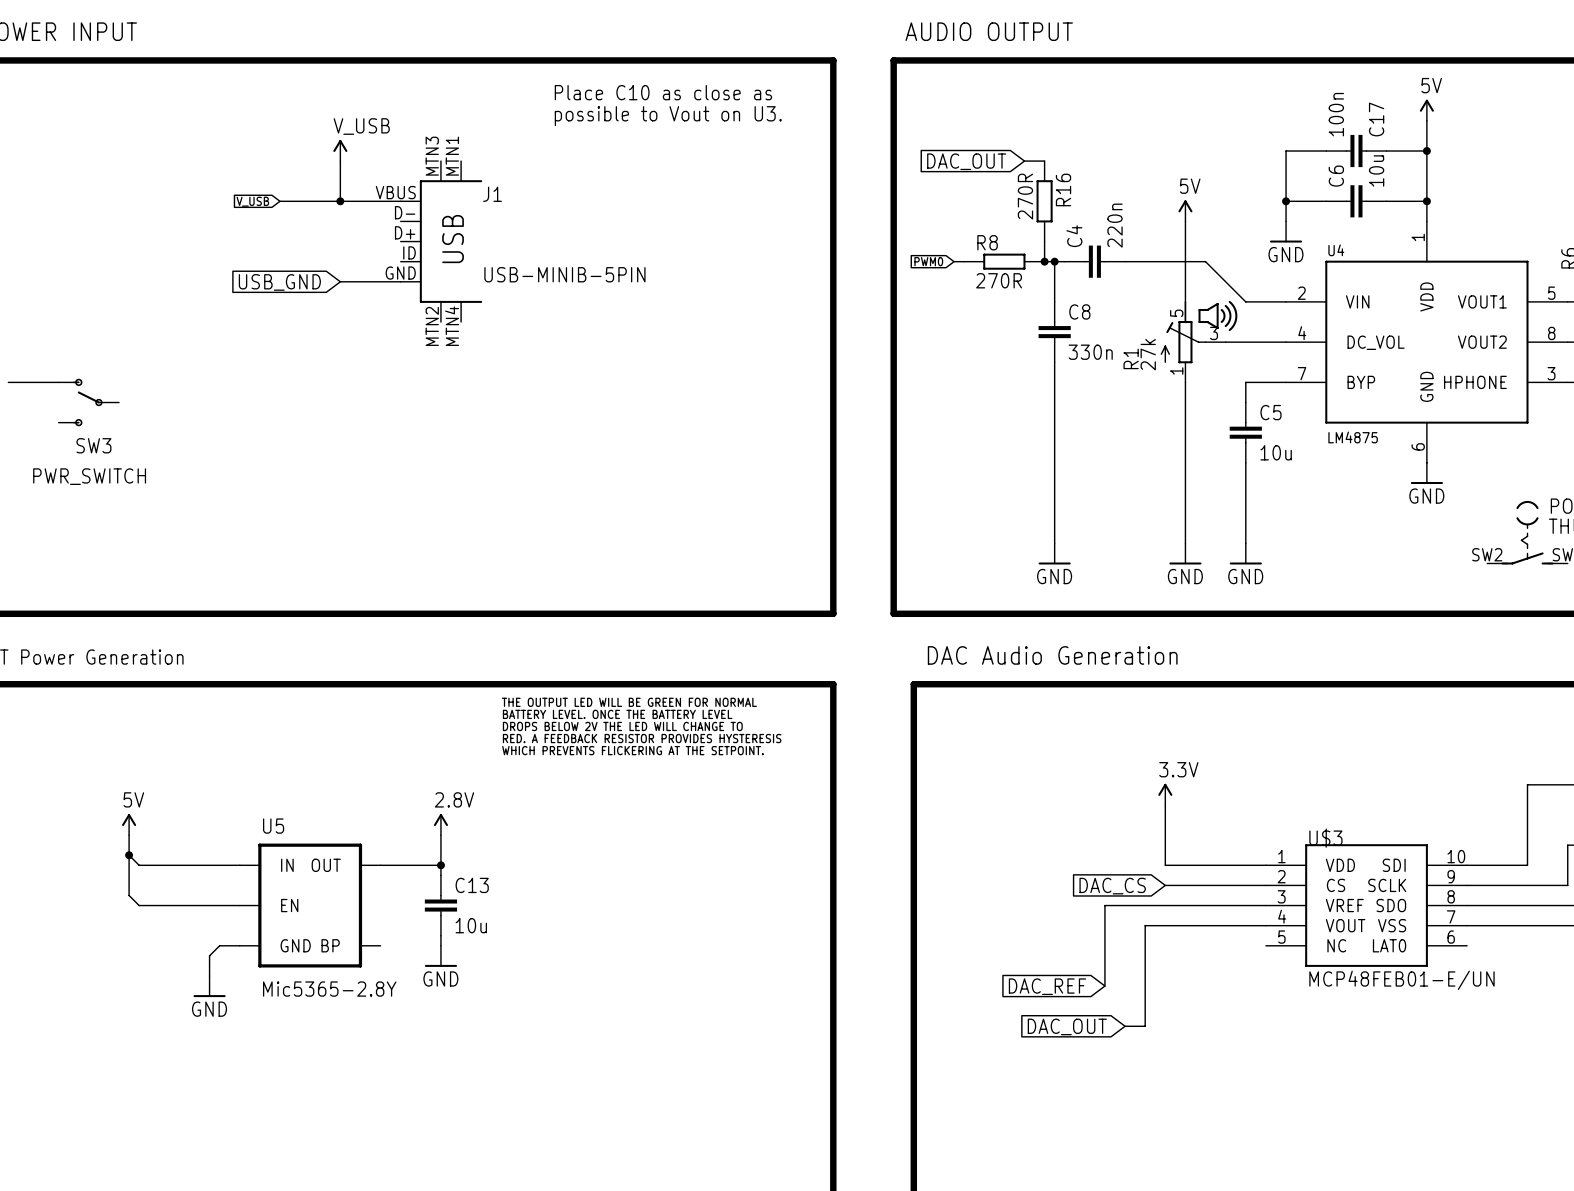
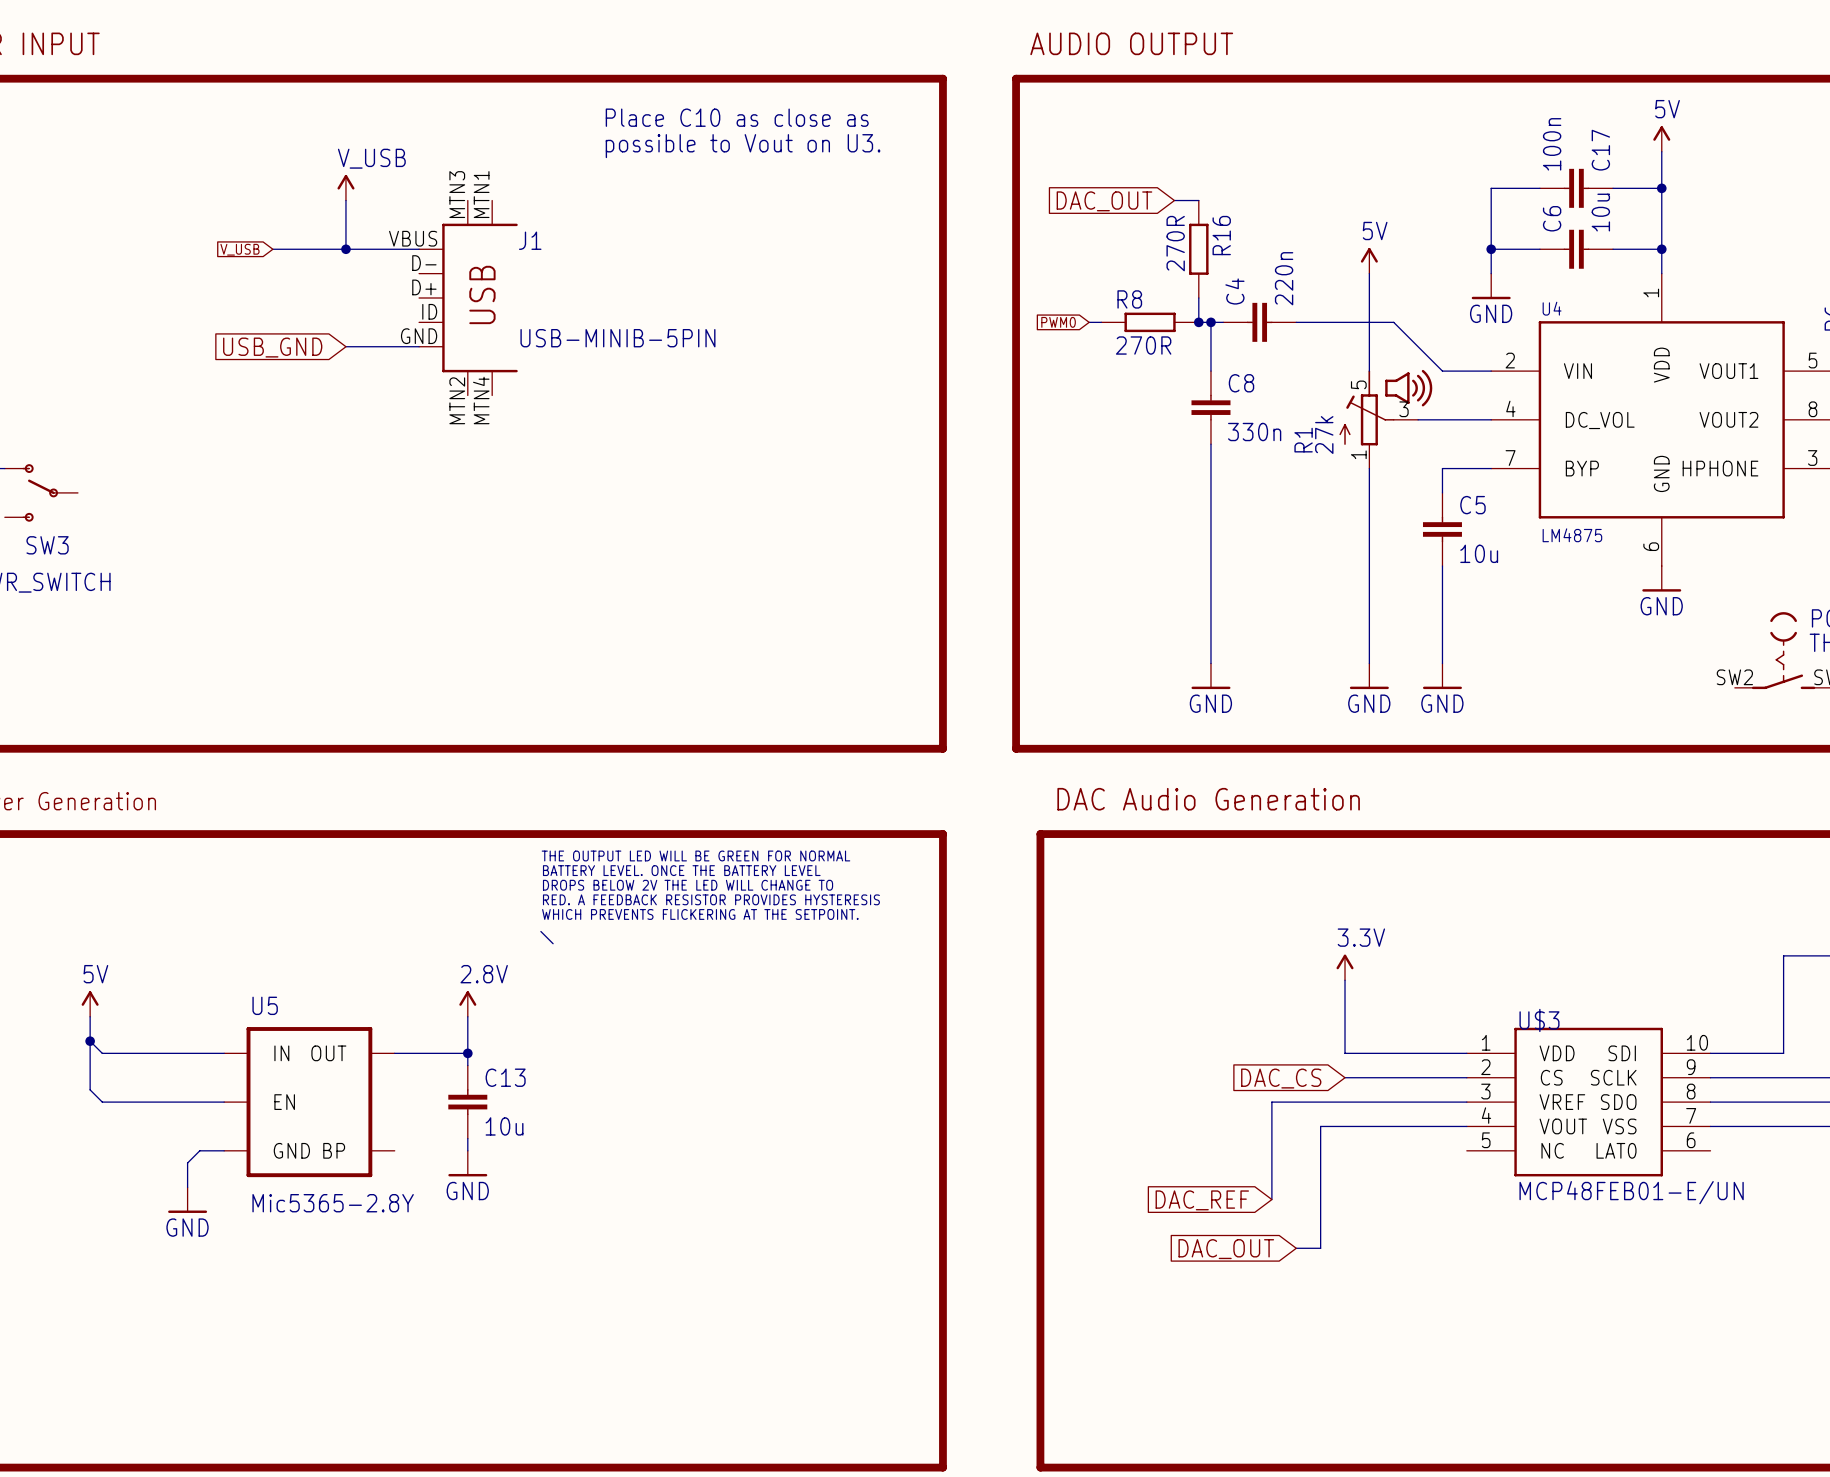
wire: none -> (540, 931) (553, 943)

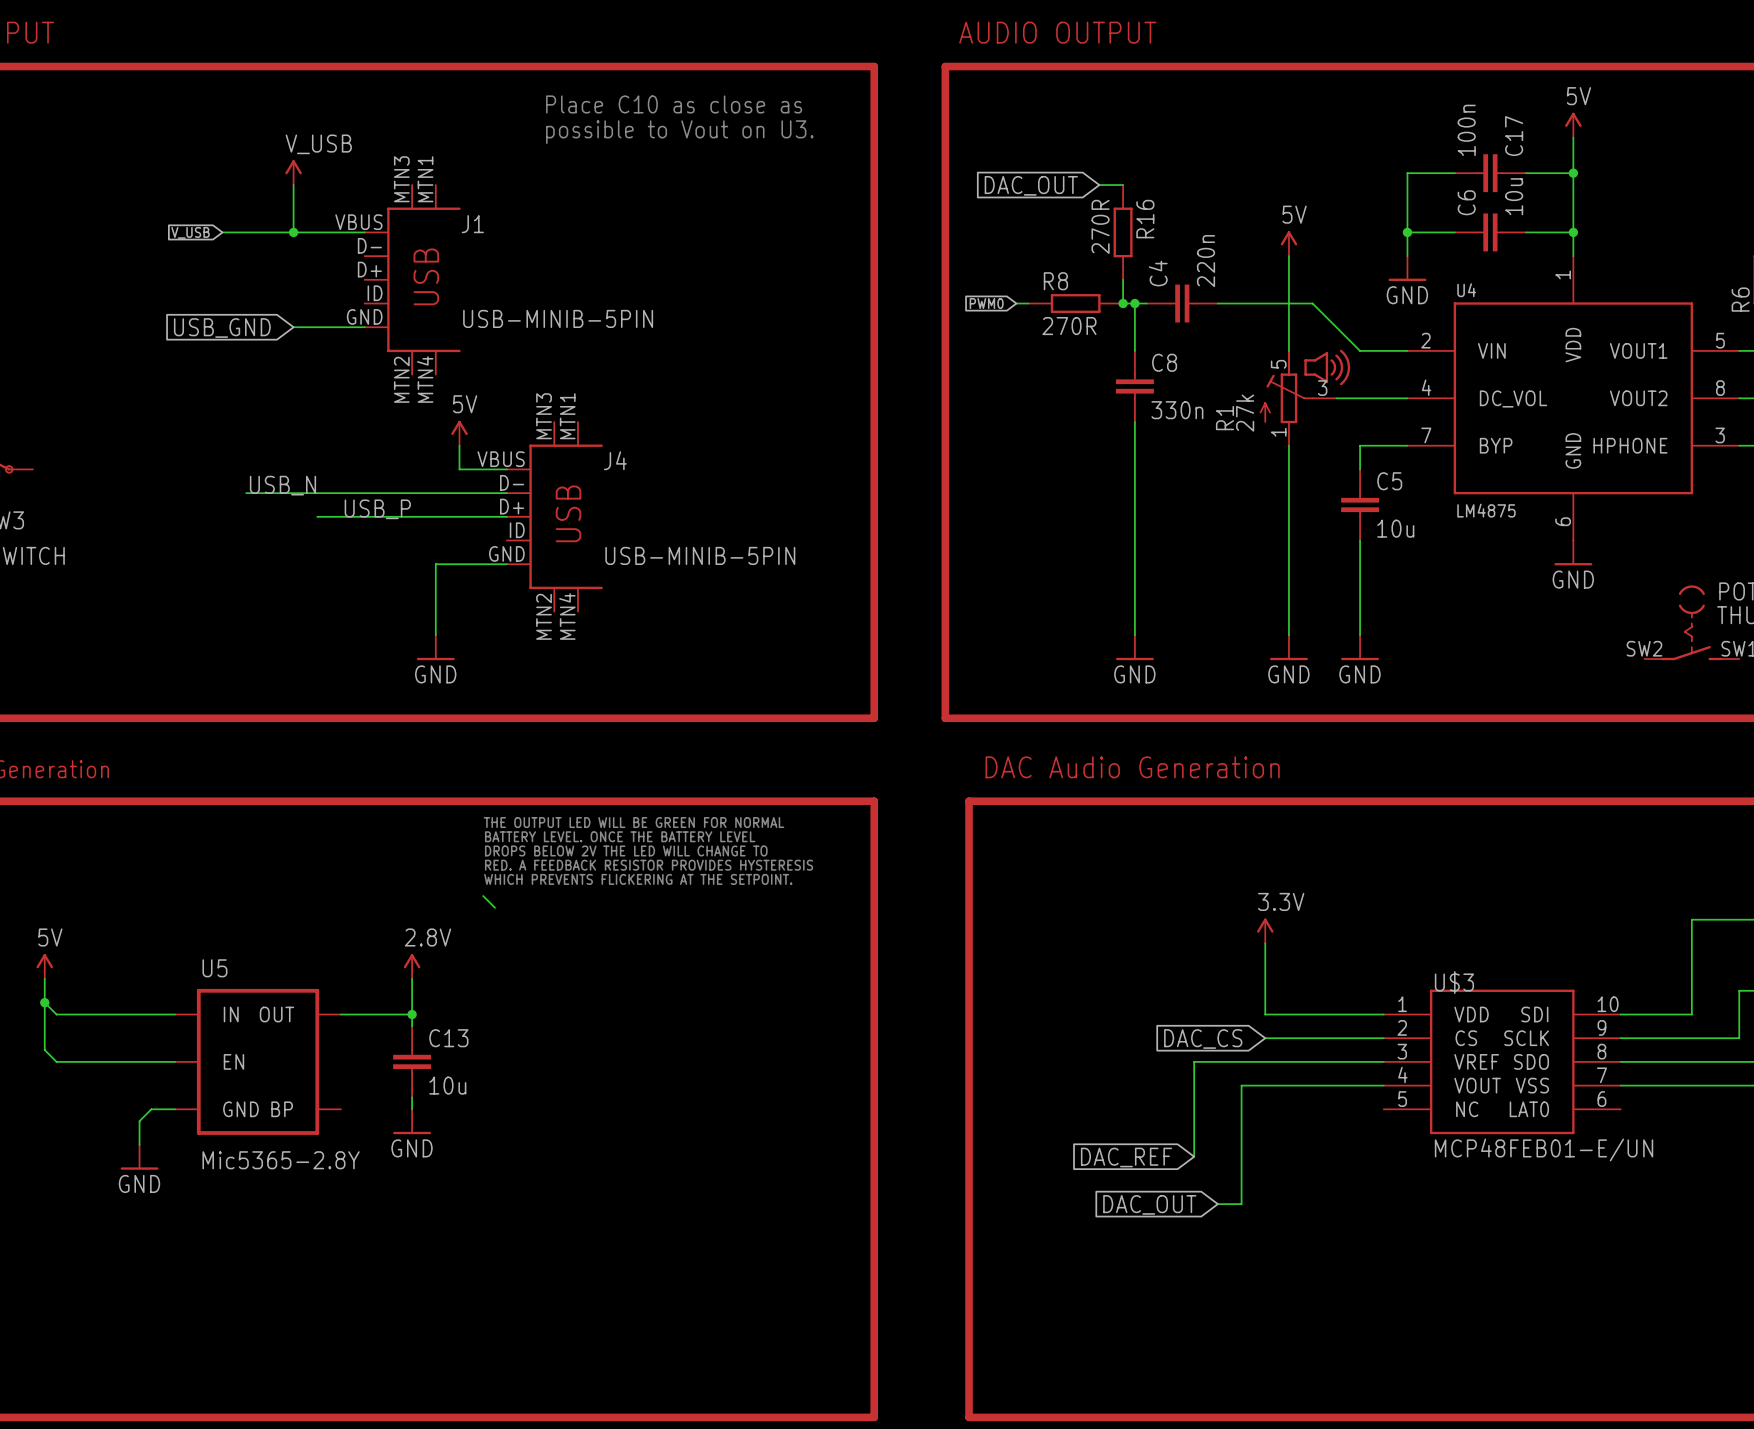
power symbol: none -> 5V (459, 433)
wire: none -> (459, 445) (459, 469) (506, 469)
label: none -> USB_N (282, 485)
wire: none -> (246, 493) (506, 493)
label: none -> USB_P (377, 509)
wire: none -> (317, 516) (506, 516)
J4: none -> USB-MINIB-5PIN (554, 516)
wire: none -> (506, 564) (435, 564) (435, 635)
power symbol: none -> GND (435, 647)

